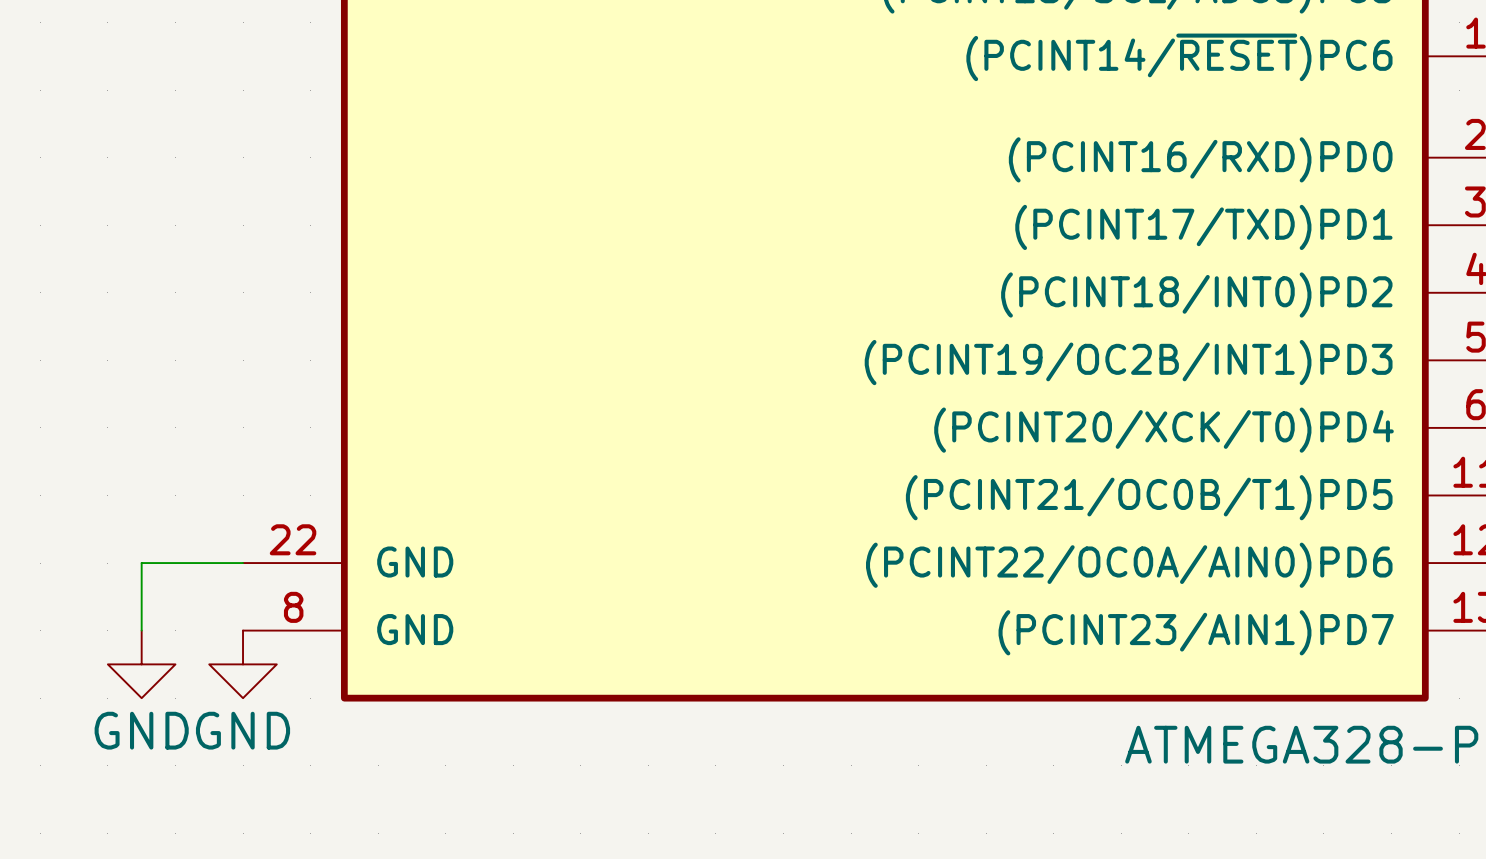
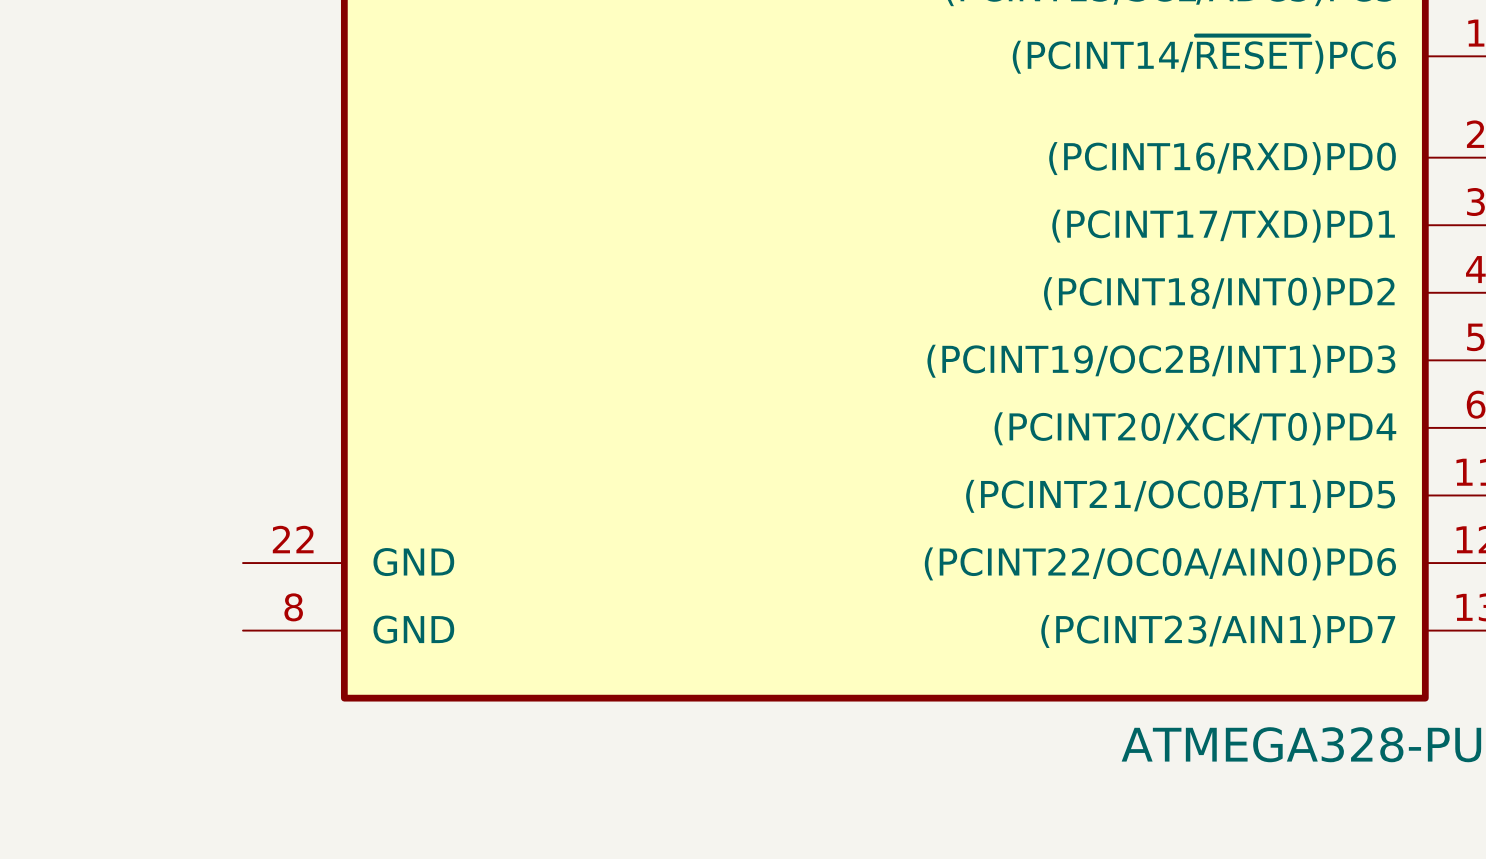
wire: (243, 563) (141, 563) (141, 630) -> none
power symbol: GND (141, 664) -> none
power symbol: GND (243, 664) -> none

